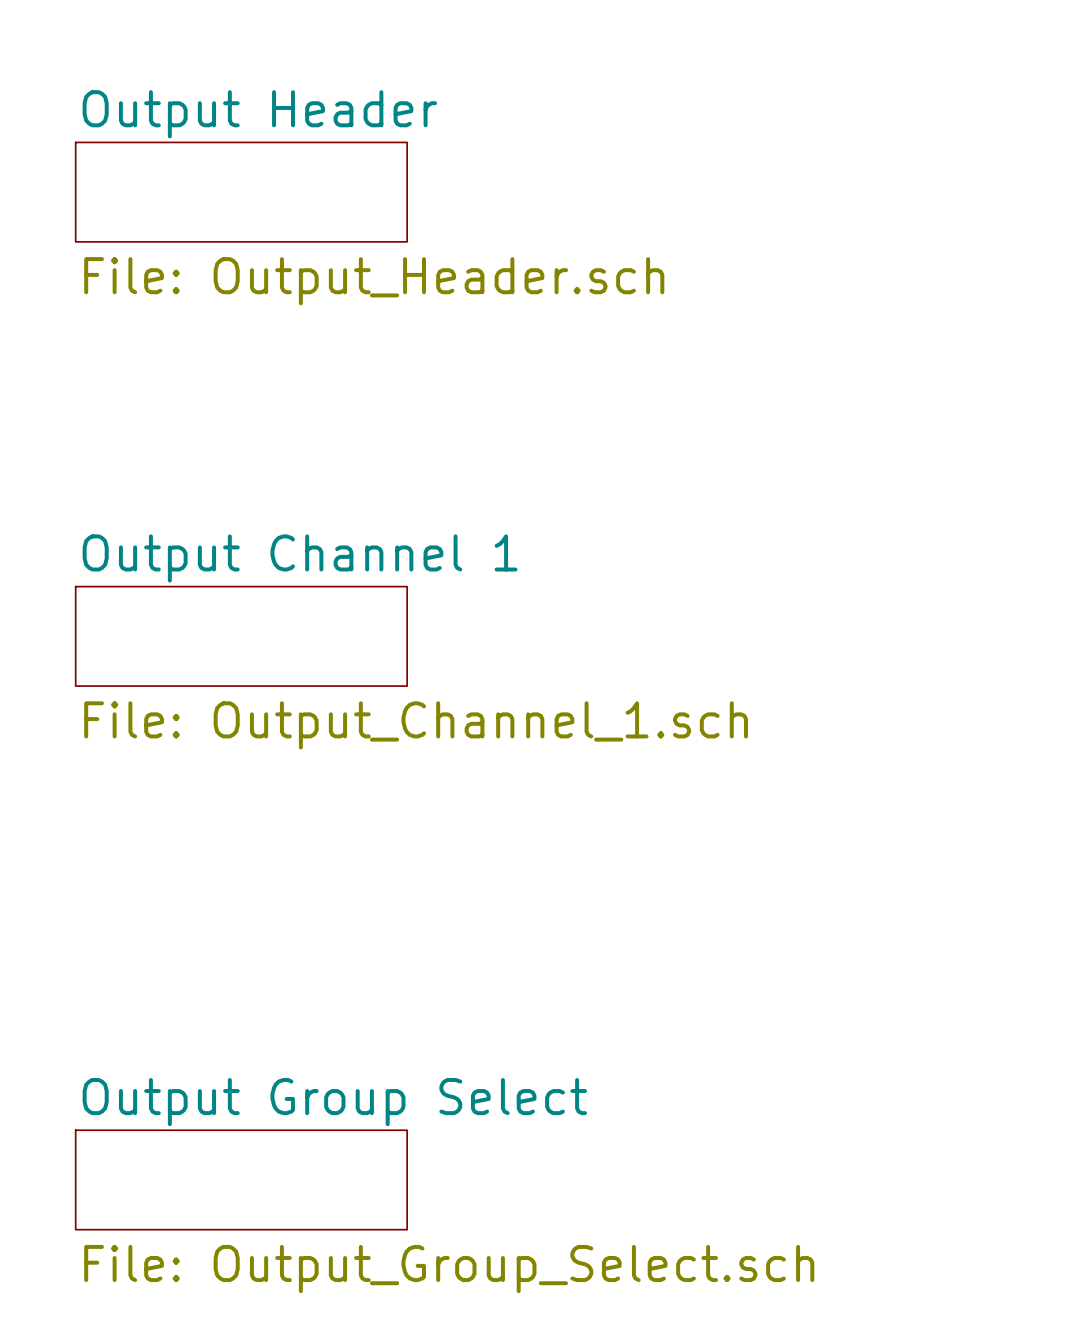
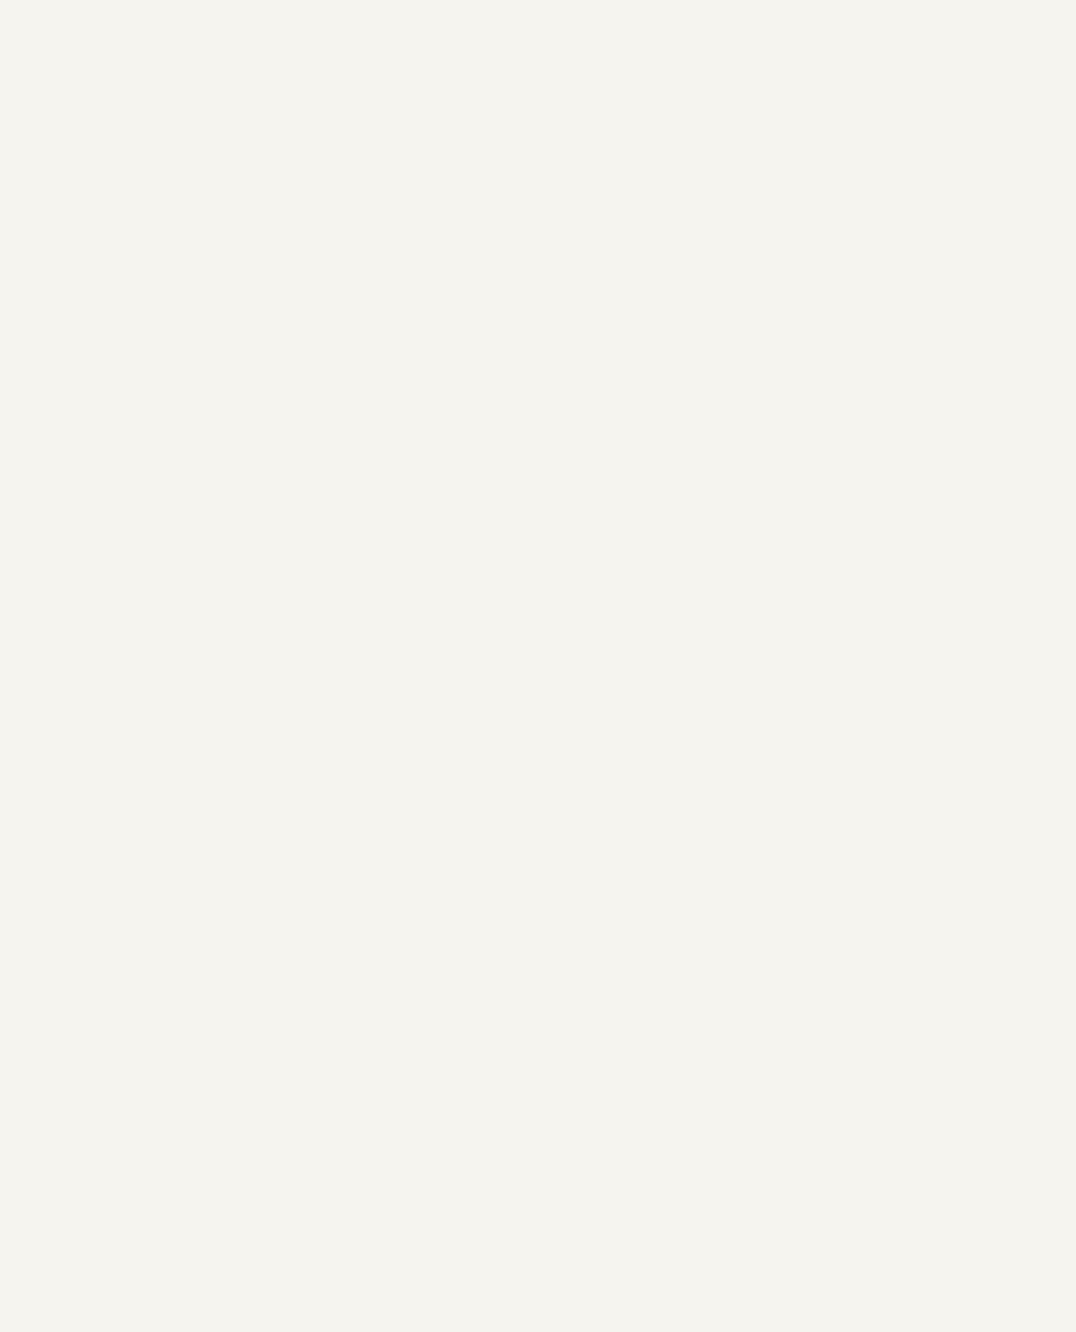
sheet Output Header: File: Output_Header.sch (241, 192) -> none
sheet Output Channel 1: File: Output_Channel_1.sch (241, 636) -> none
sheet Output Group Select: File: Output_Group_Select.sch (241, 1179) -> none

